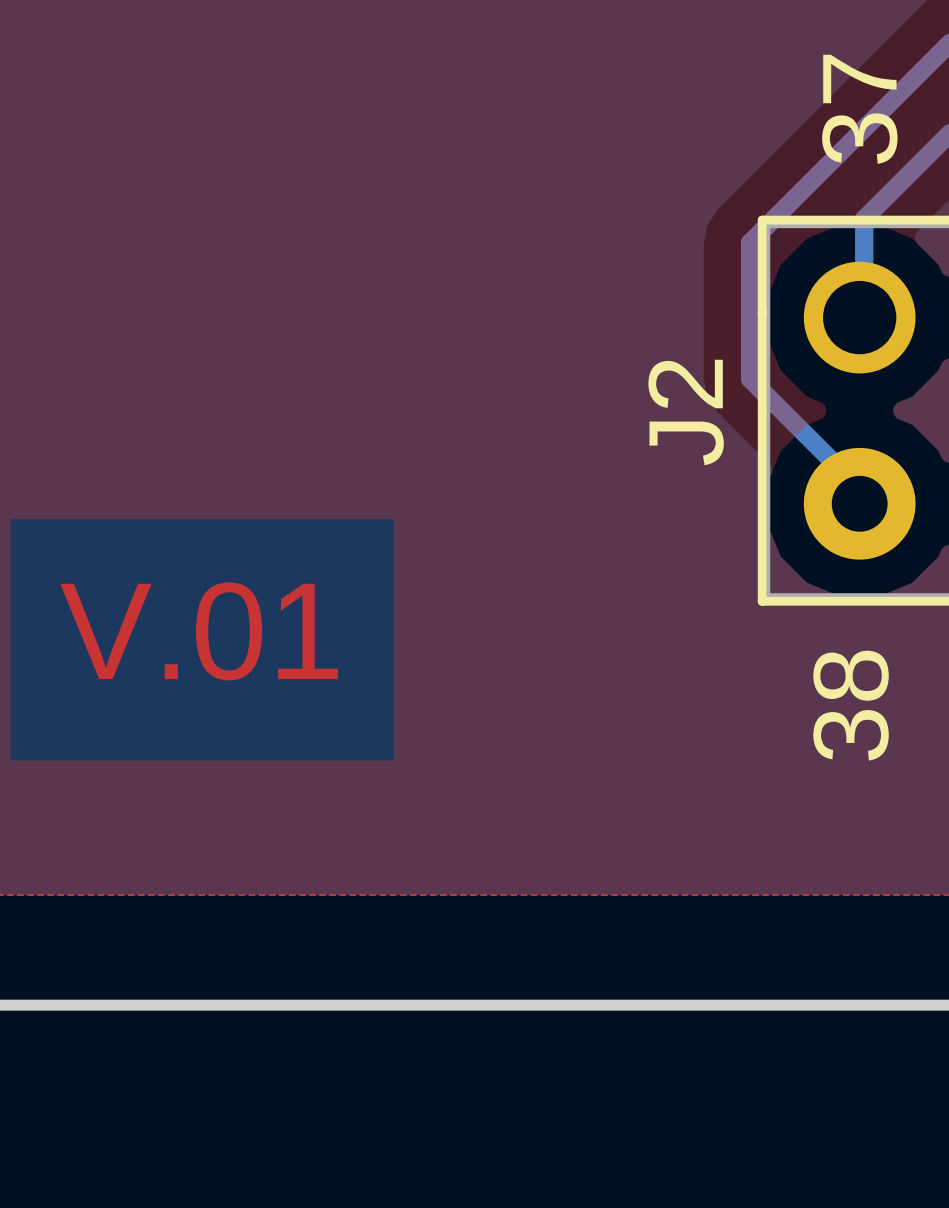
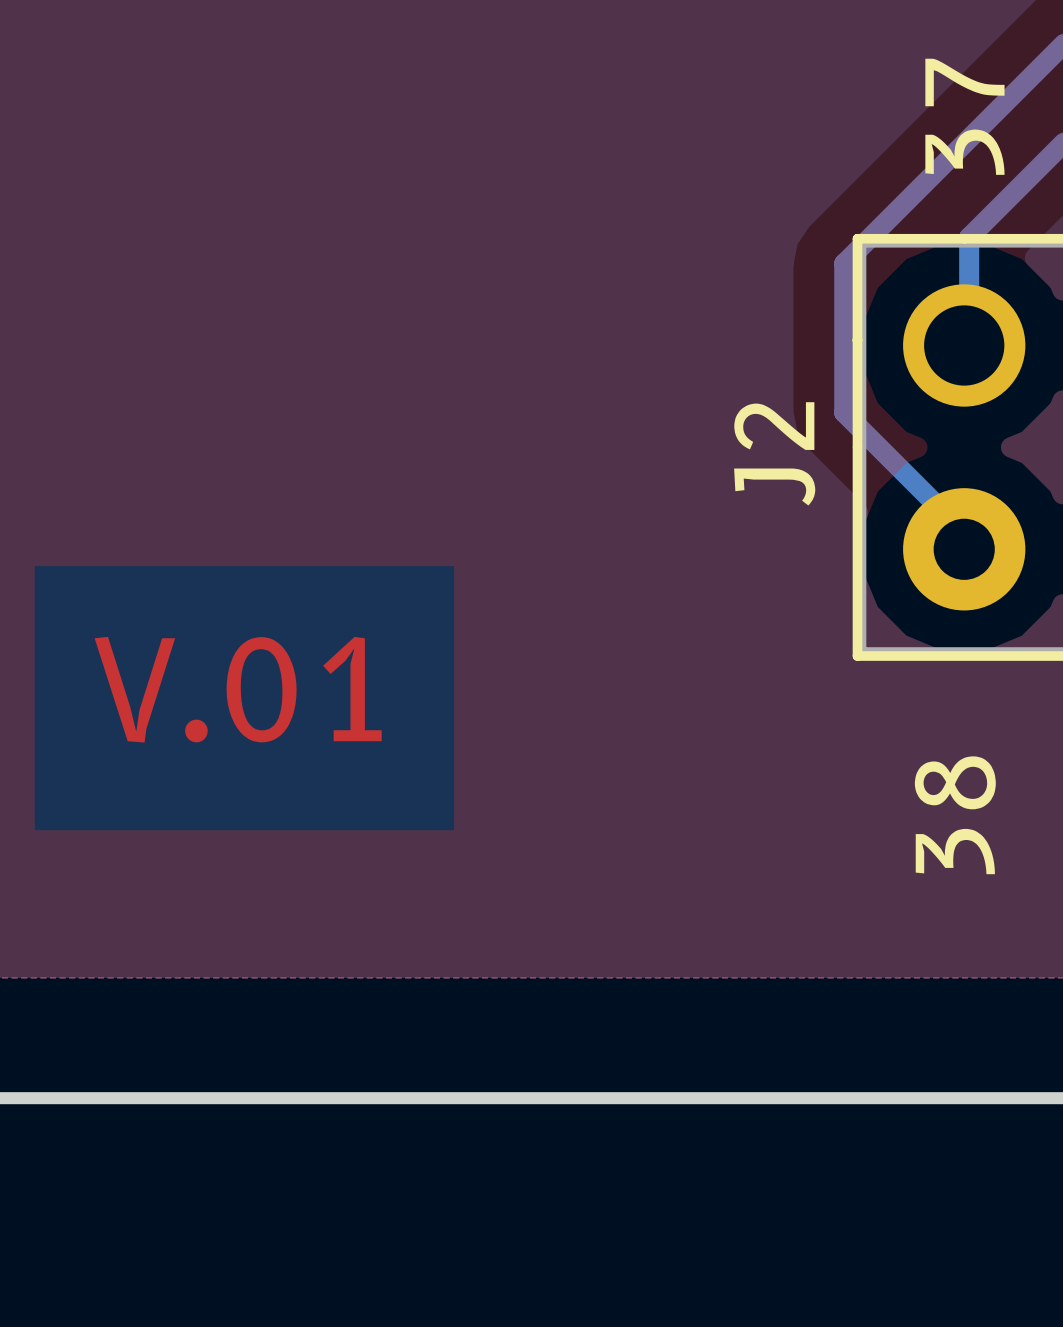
text position: 38 (851, 705) -> 38 (955, 815)

